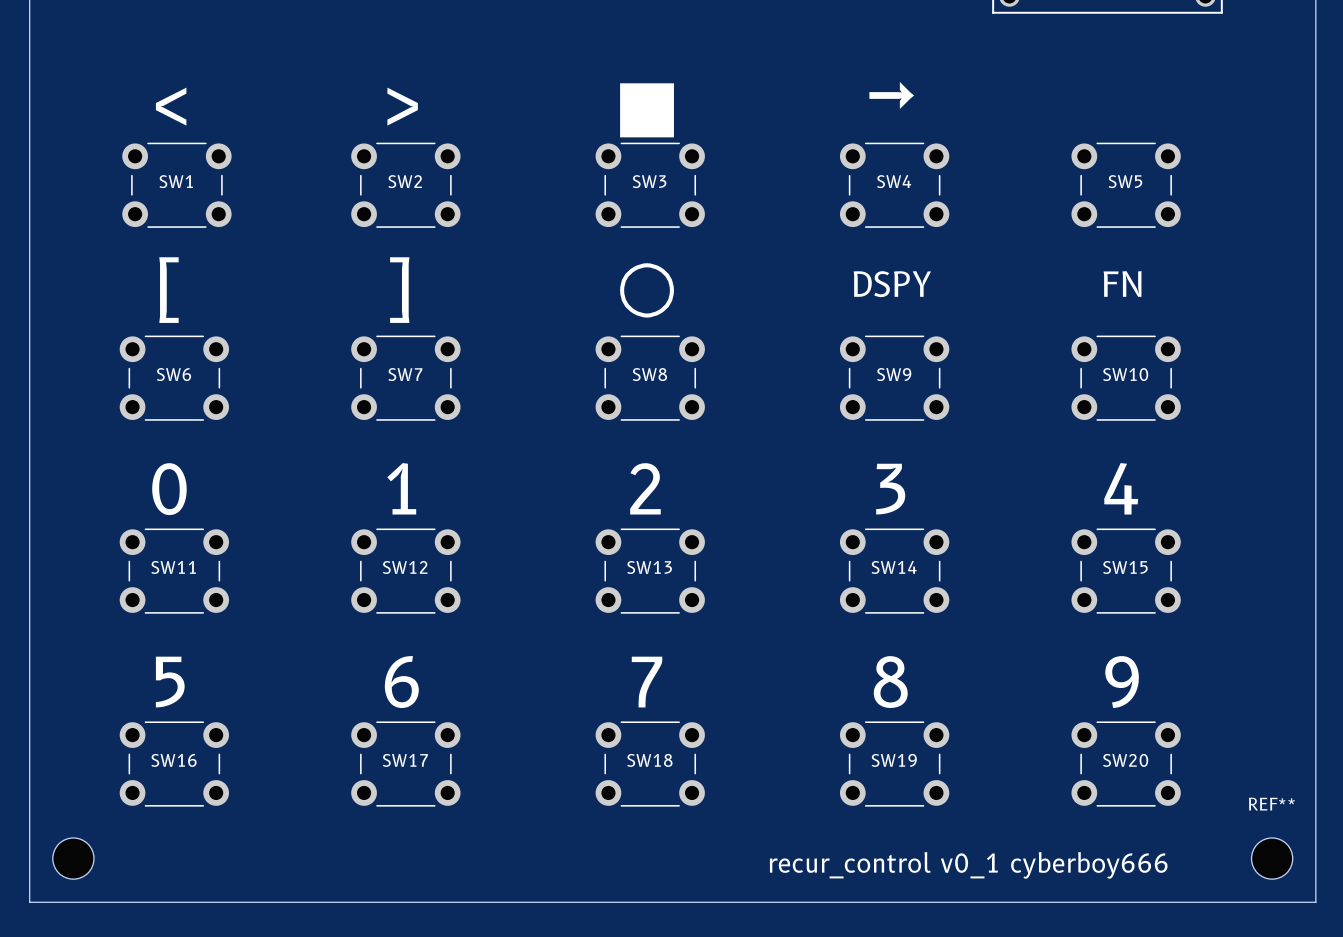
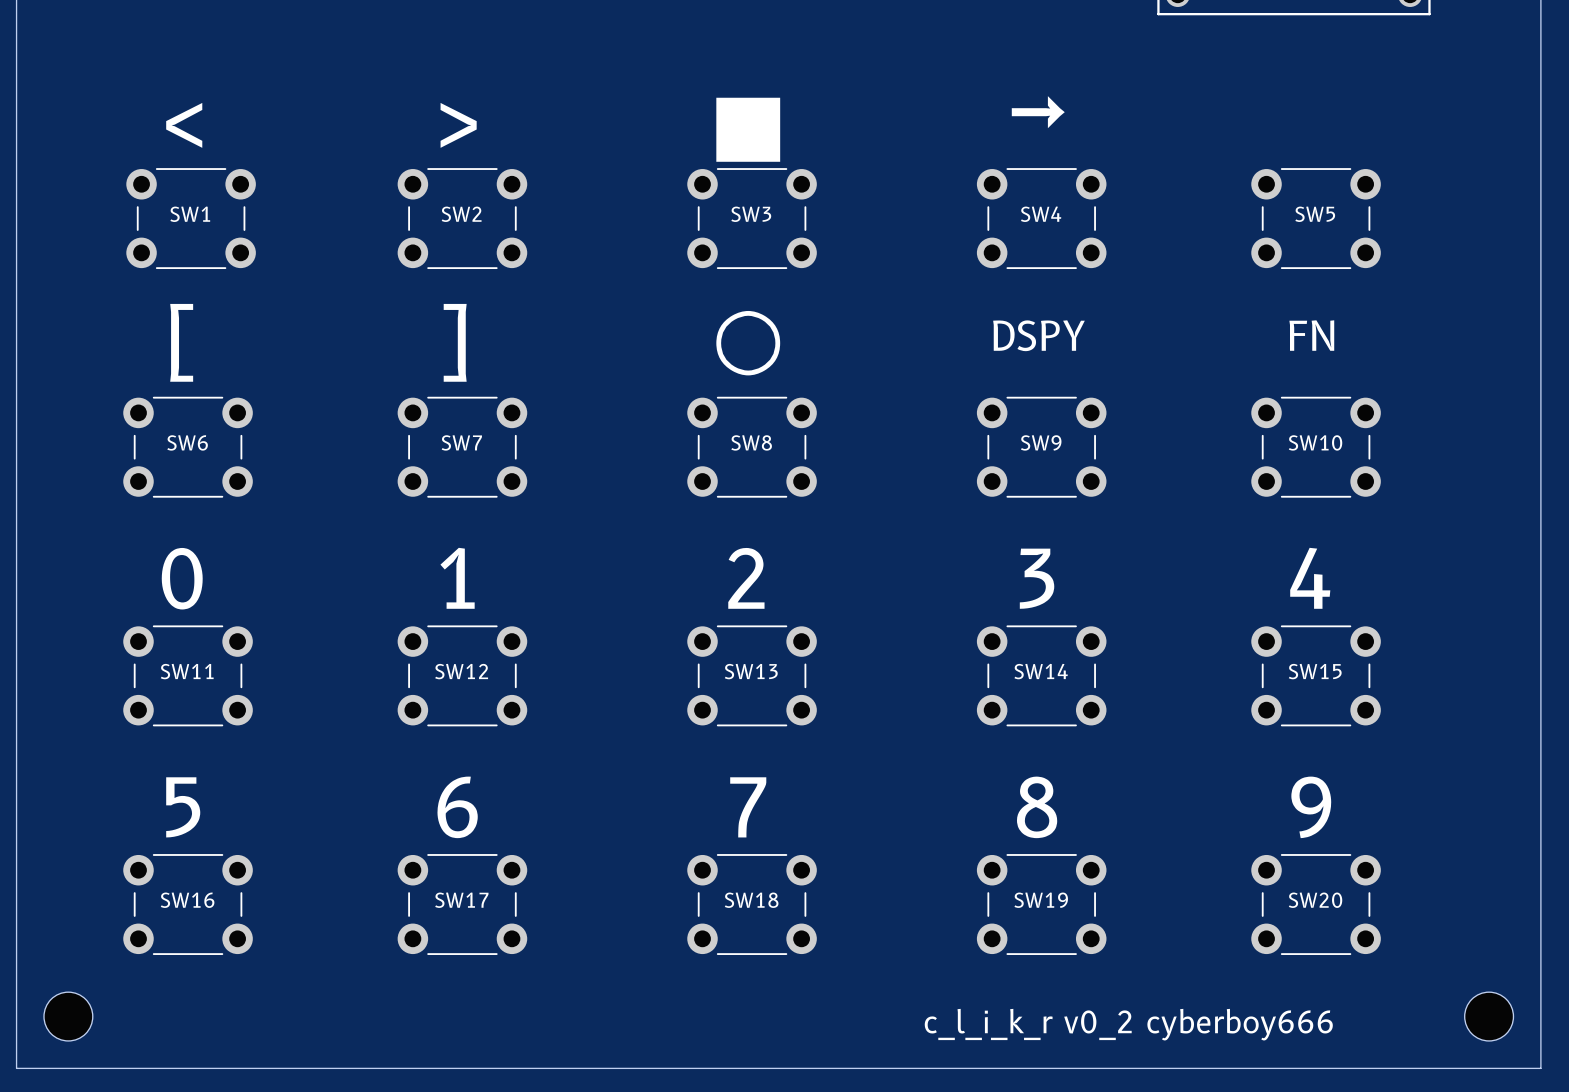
REF** name: REF** (1271, 804) -> none
text: recur_control v0_1 cyberboy666 (968, 865) -> c_l_i_k_r v0_2 cyberboy666 (1128, 1024)

